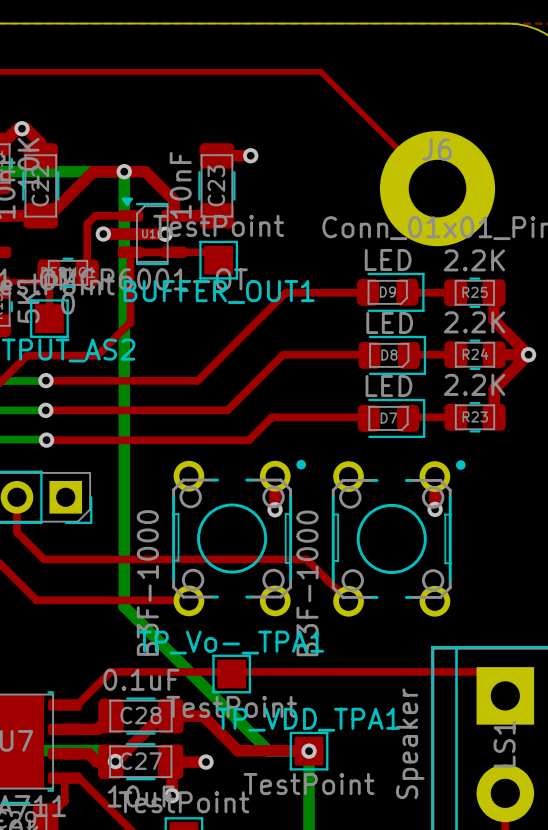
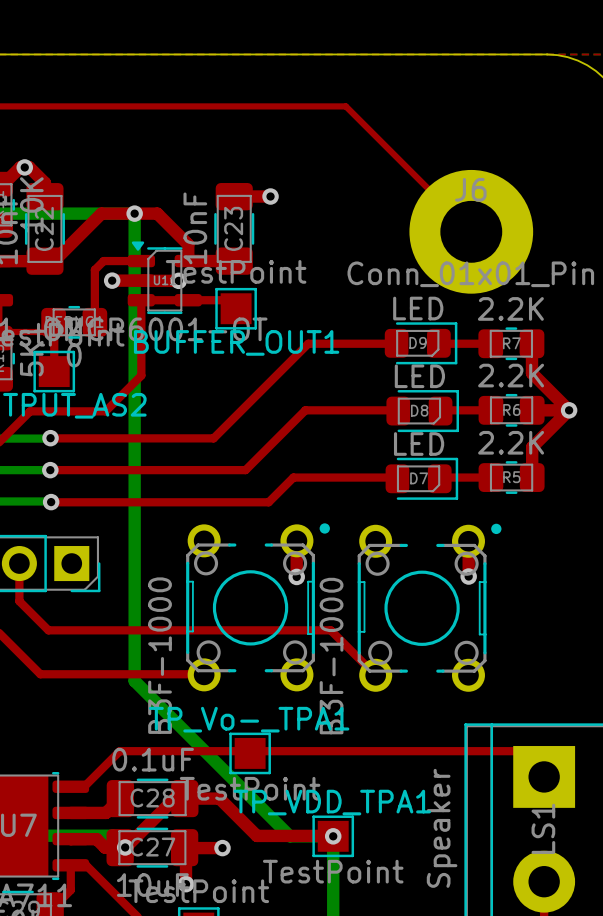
R25 name: R25 (475, 292) -> R7 (511, 343)
R24 name: R24 (475, 354) -> R6 (511, 409)
R23 name: R23 (475, 416) -> R5 (511, 477)

